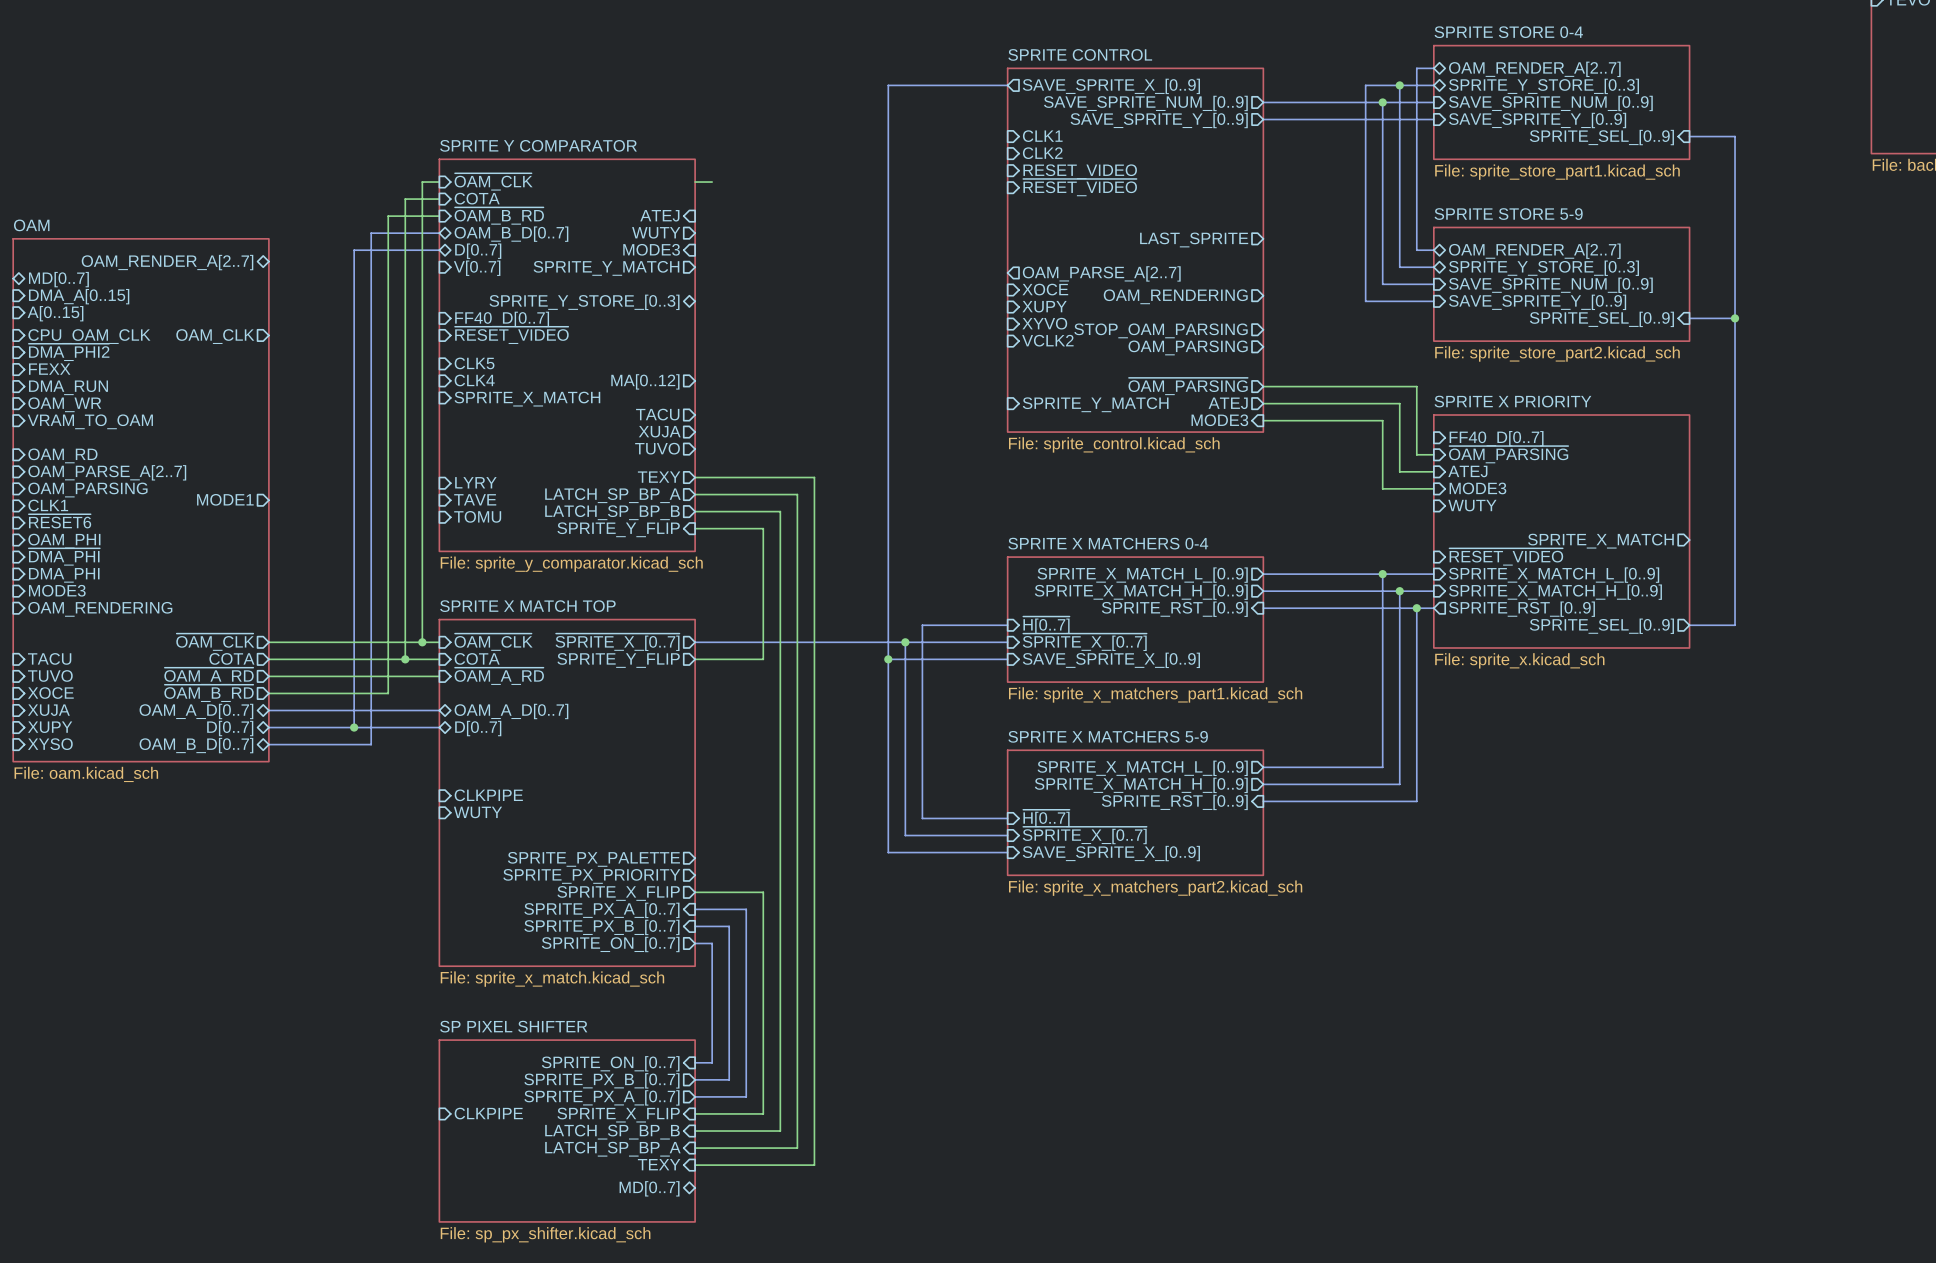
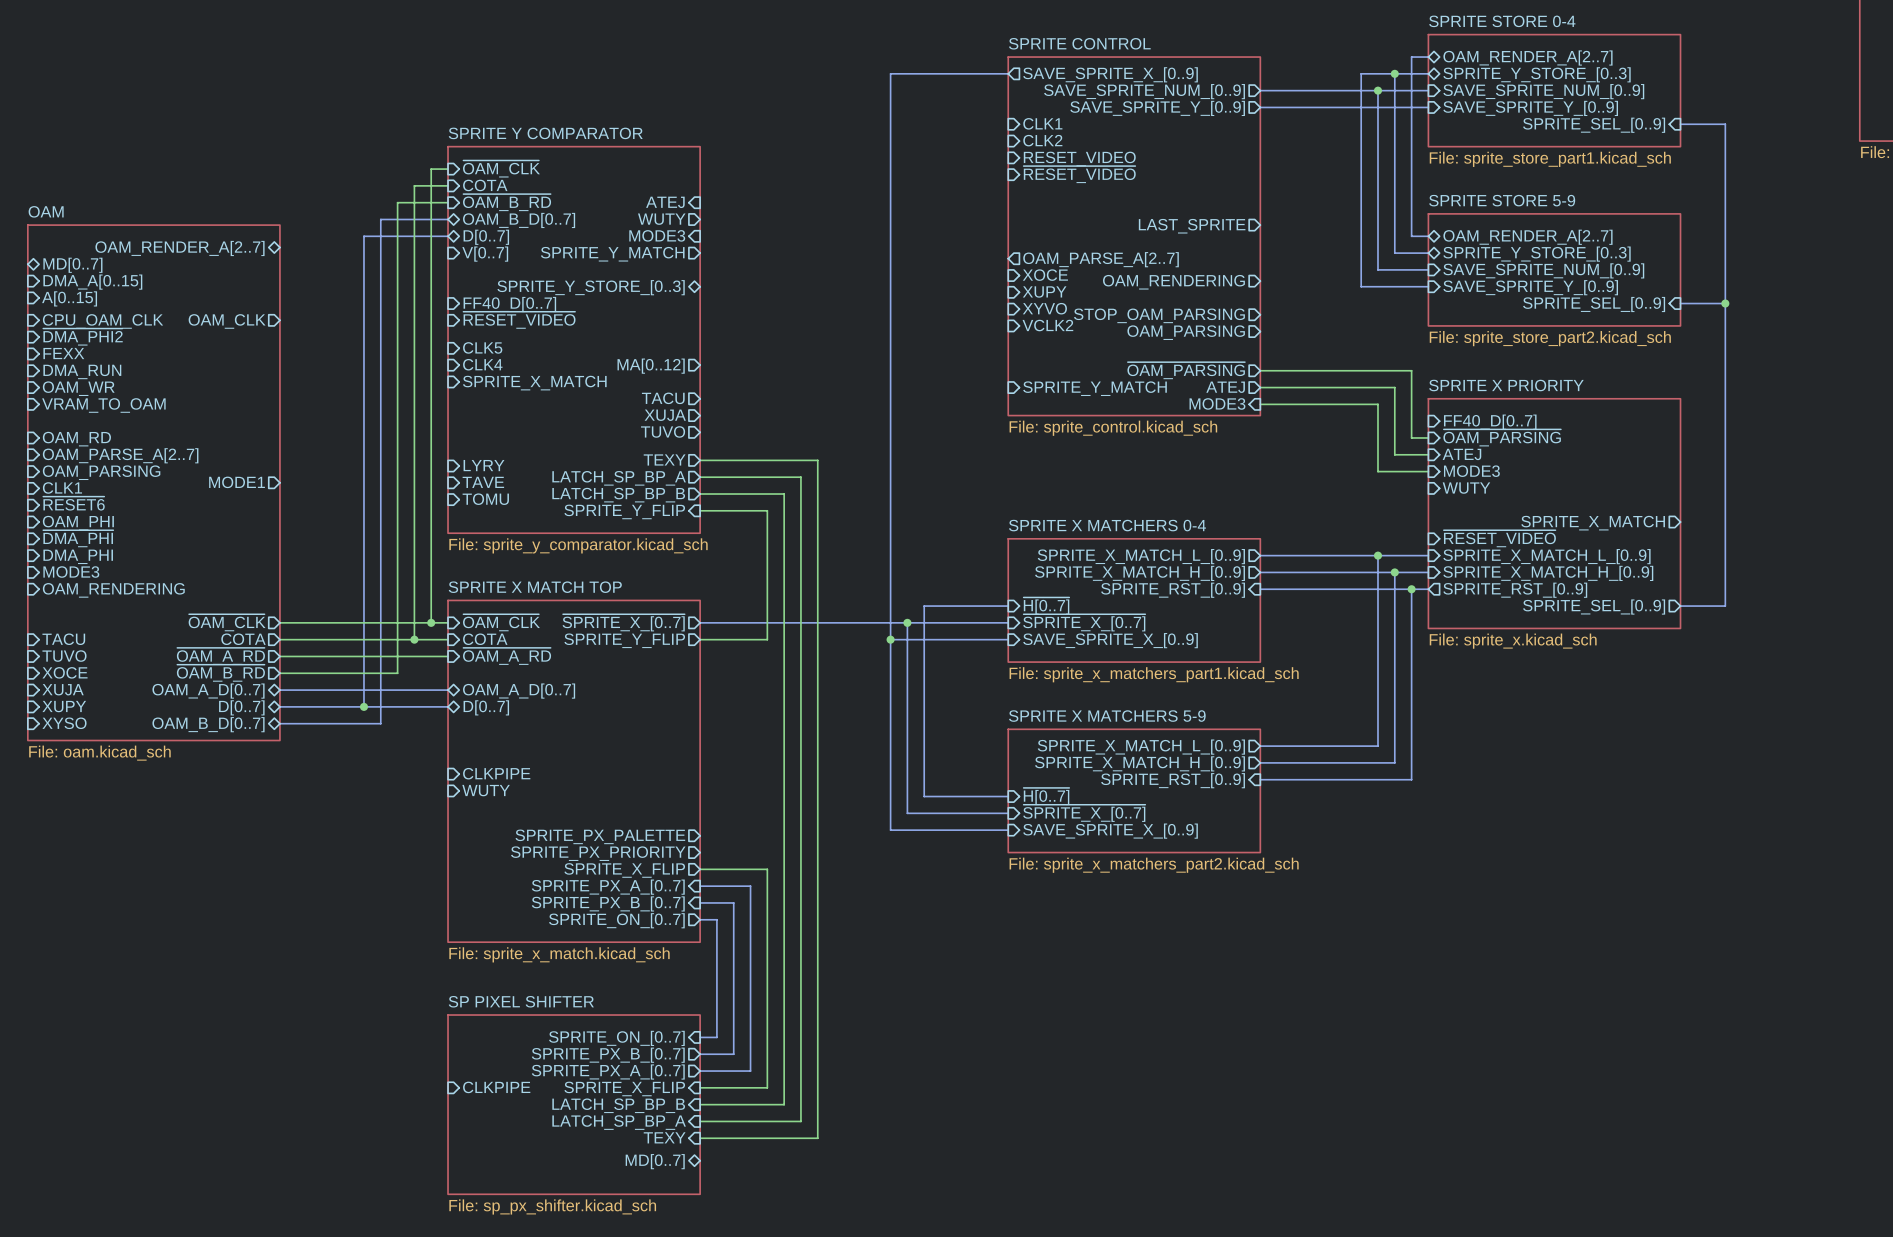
wire: (695, 182) (712, 182) -> none

